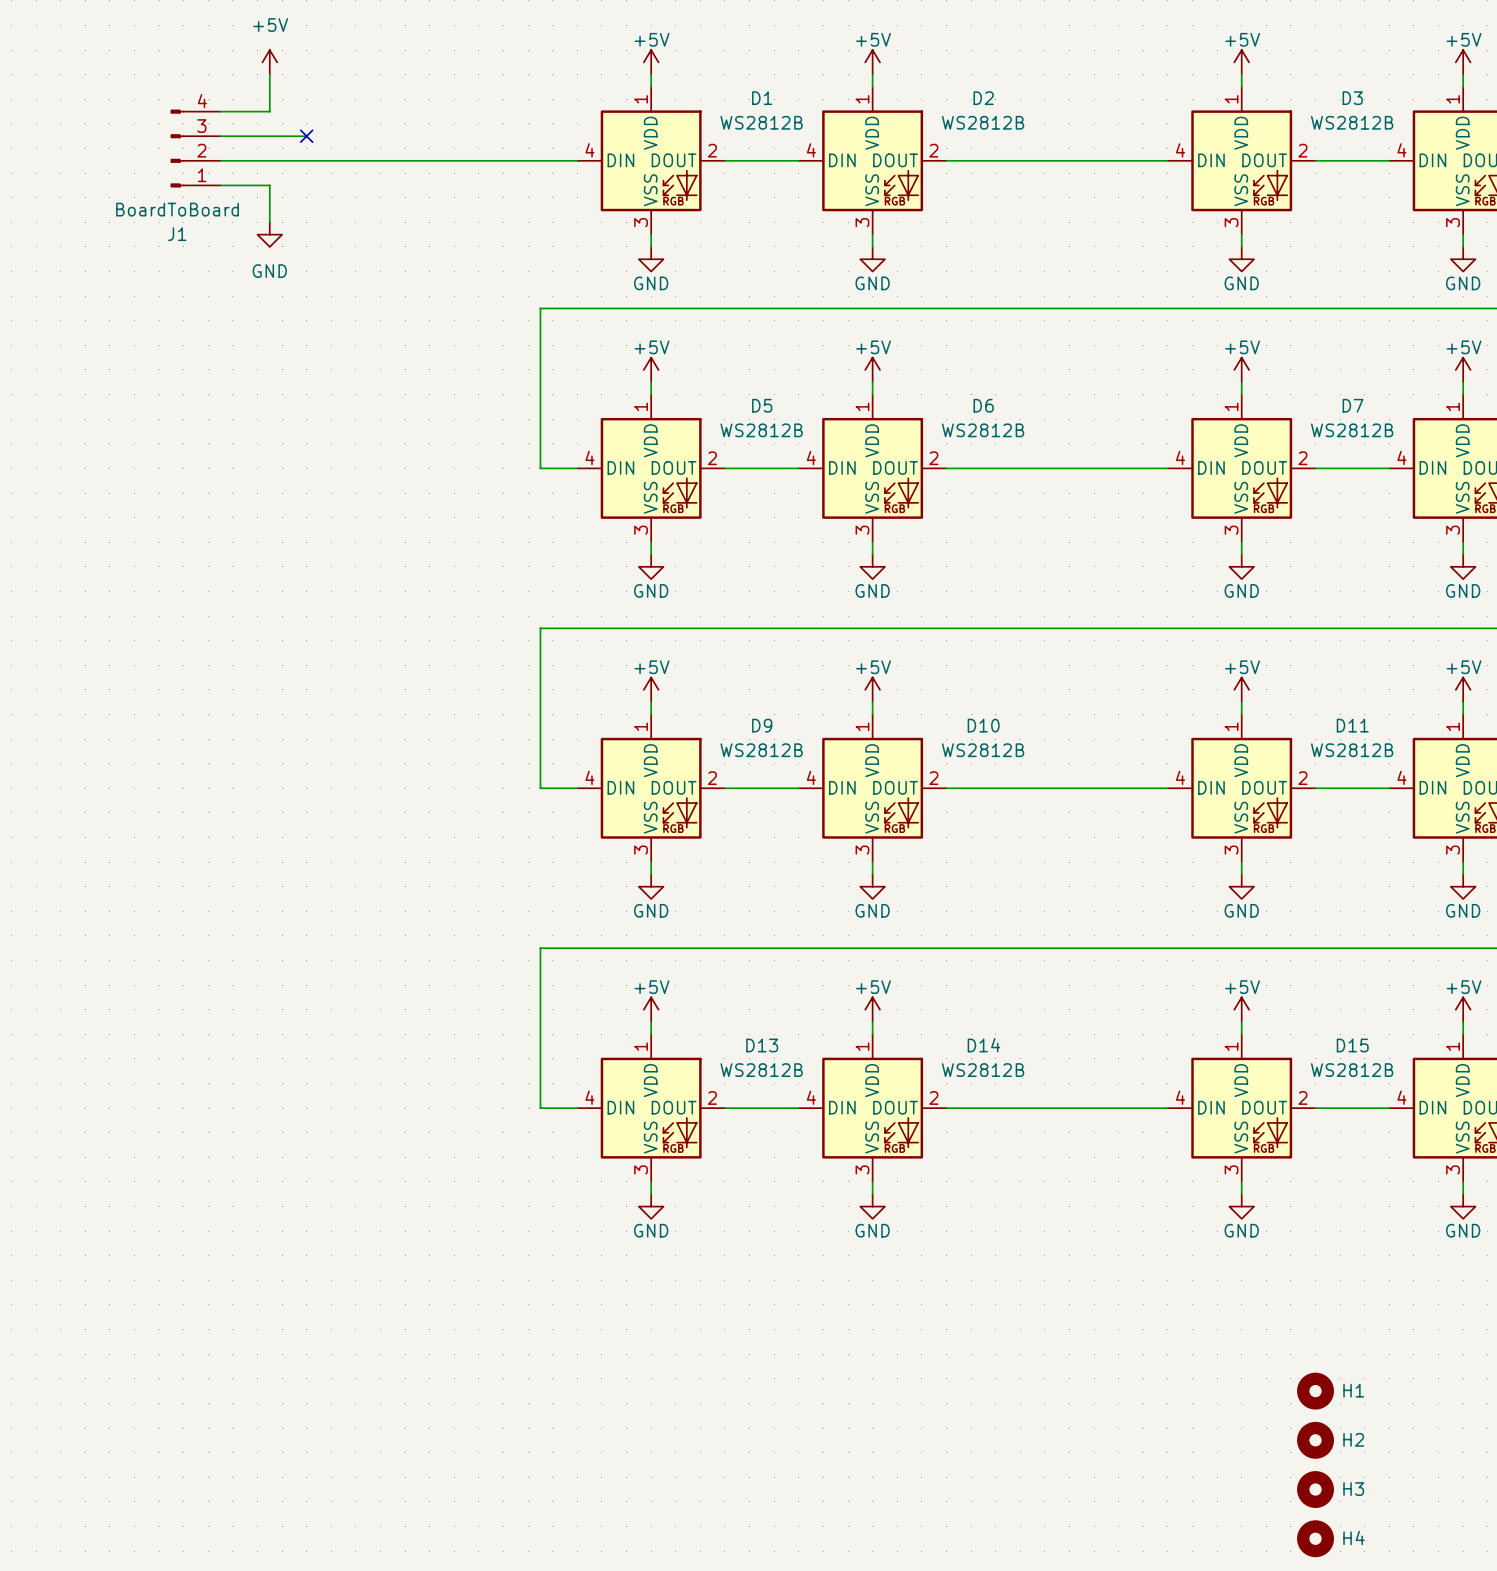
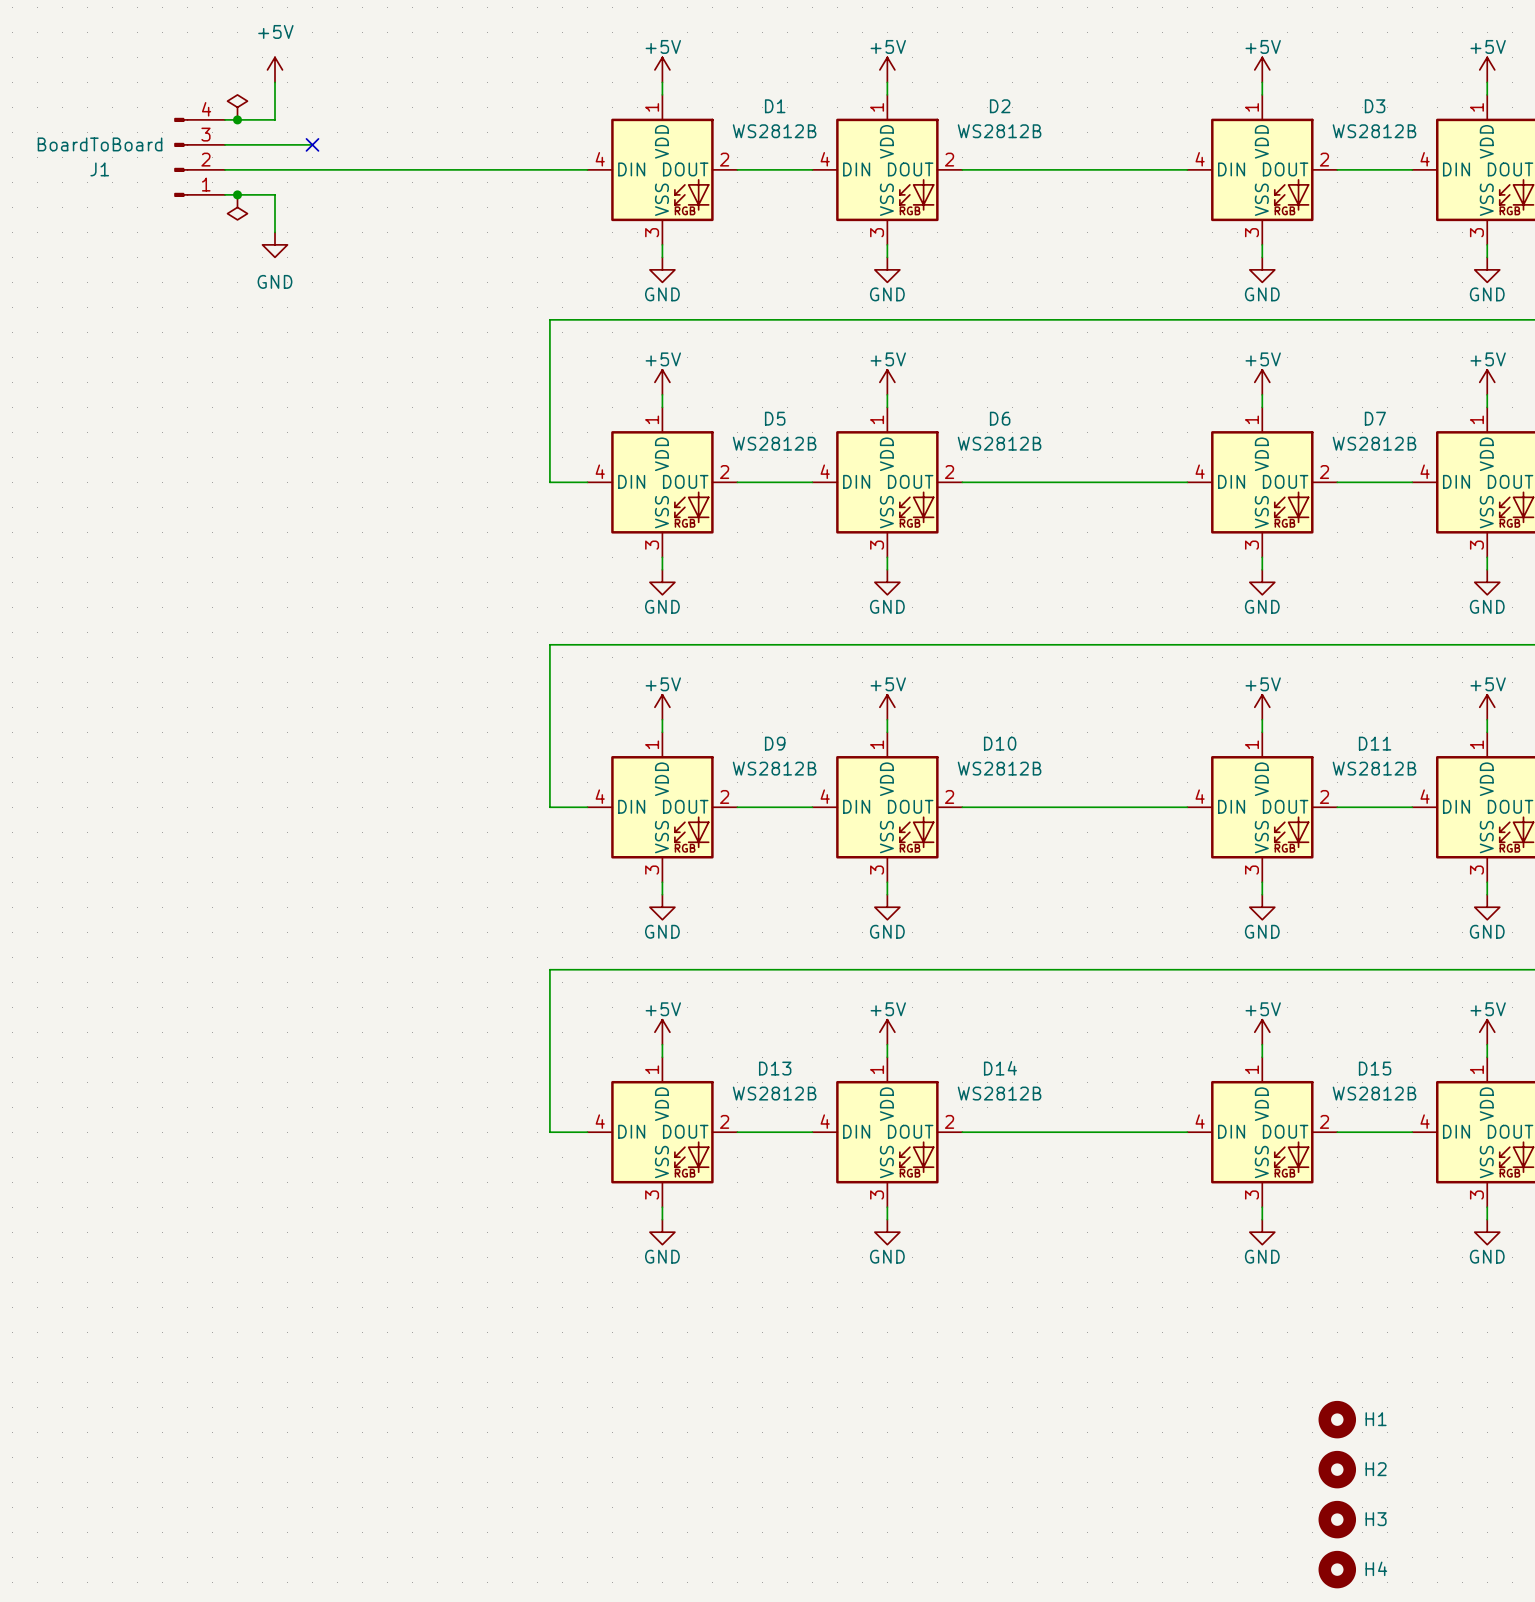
power symbol: none -> (237, 107)
junction: none -> (237, 119)
junction: none -> (237, 194)
power symbol: none -> (237, 207)
J1 value position: BoardToBoard (177, 209) -> BoardToBoard (100, 144)
J1 name position: J1 (177, 234) -> J1 (99, 169)

